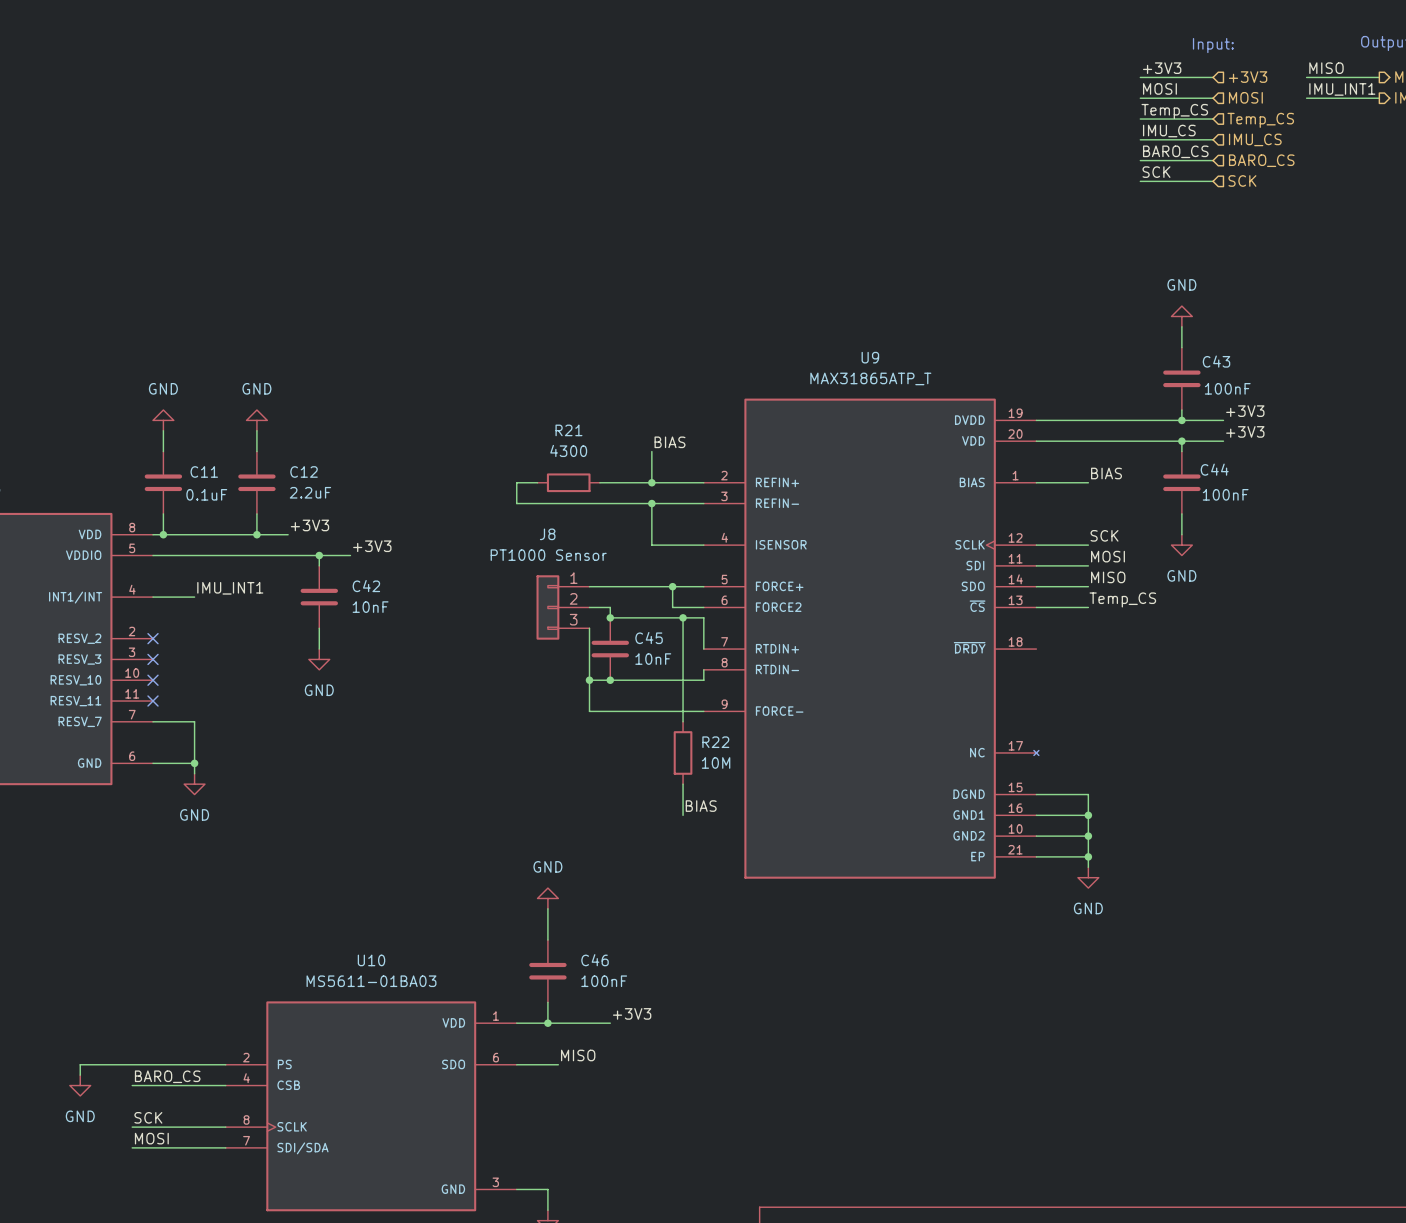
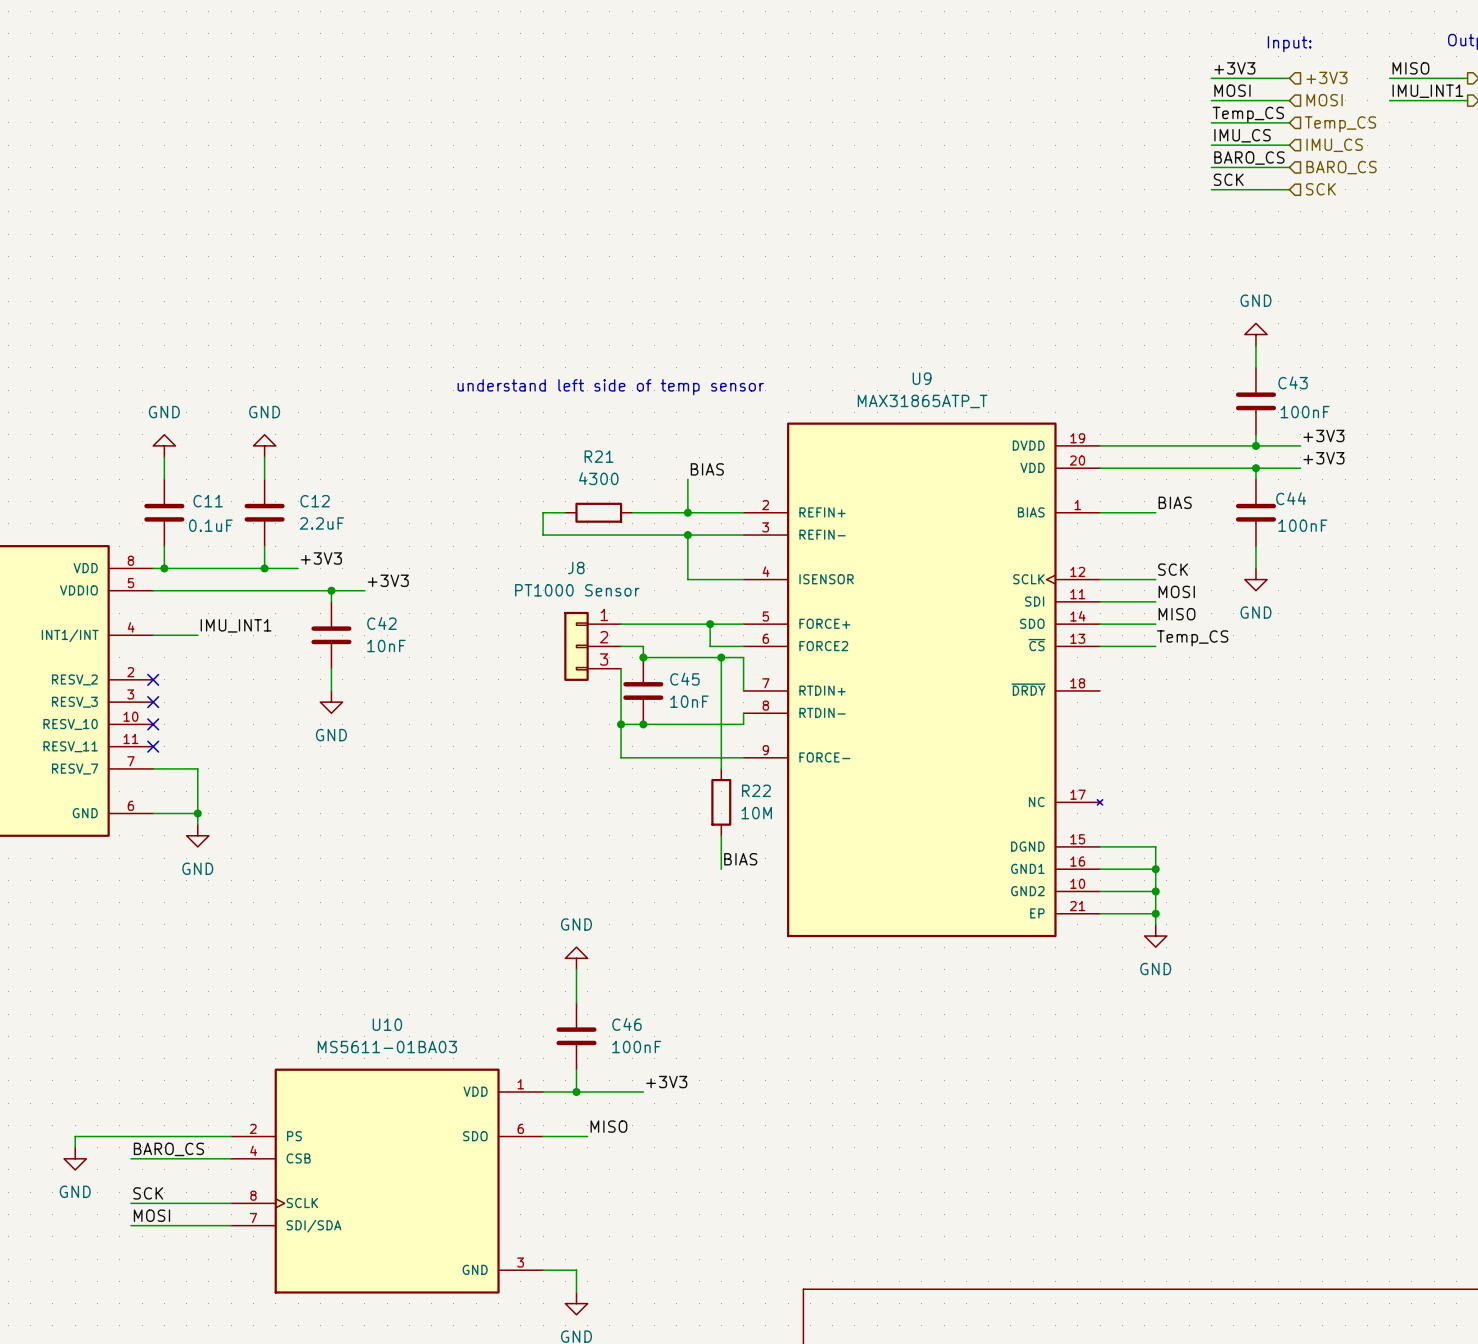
text: none -> understand left side of temp sensor (610, 387)

